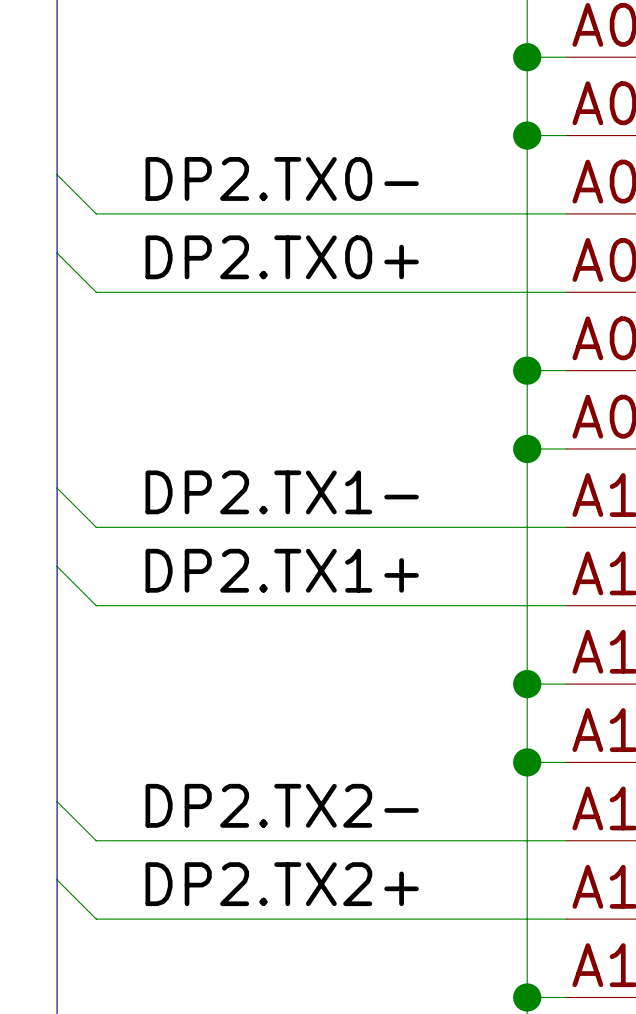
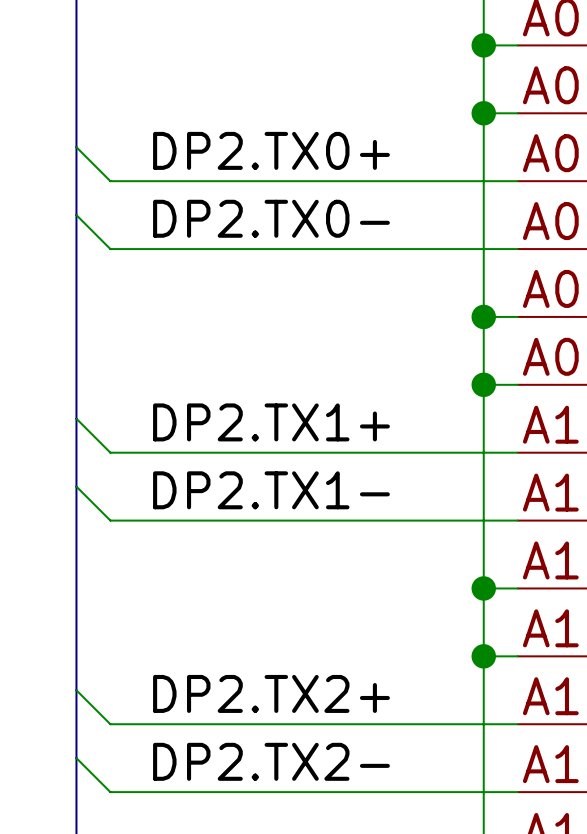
label: DP2.TX0- (282, 178) -> DP2.TX0+ (271, 150)
label: DP2.TX0+ (282, 257) -> DP2.TX0- (271, 218)
label: DP2.TX1- (282, 492) -> DP2.TX1+ (271, 422)
label: DP2.TX1+ (282, 570) -> DP2.TX1- (271, 490)
label: DP2.TX2- (282, 805) -> DP2.TX2+ (271, 693)
label: DP2.TX2+ (282, 884) -> DP2.TX2- (271, 761)

